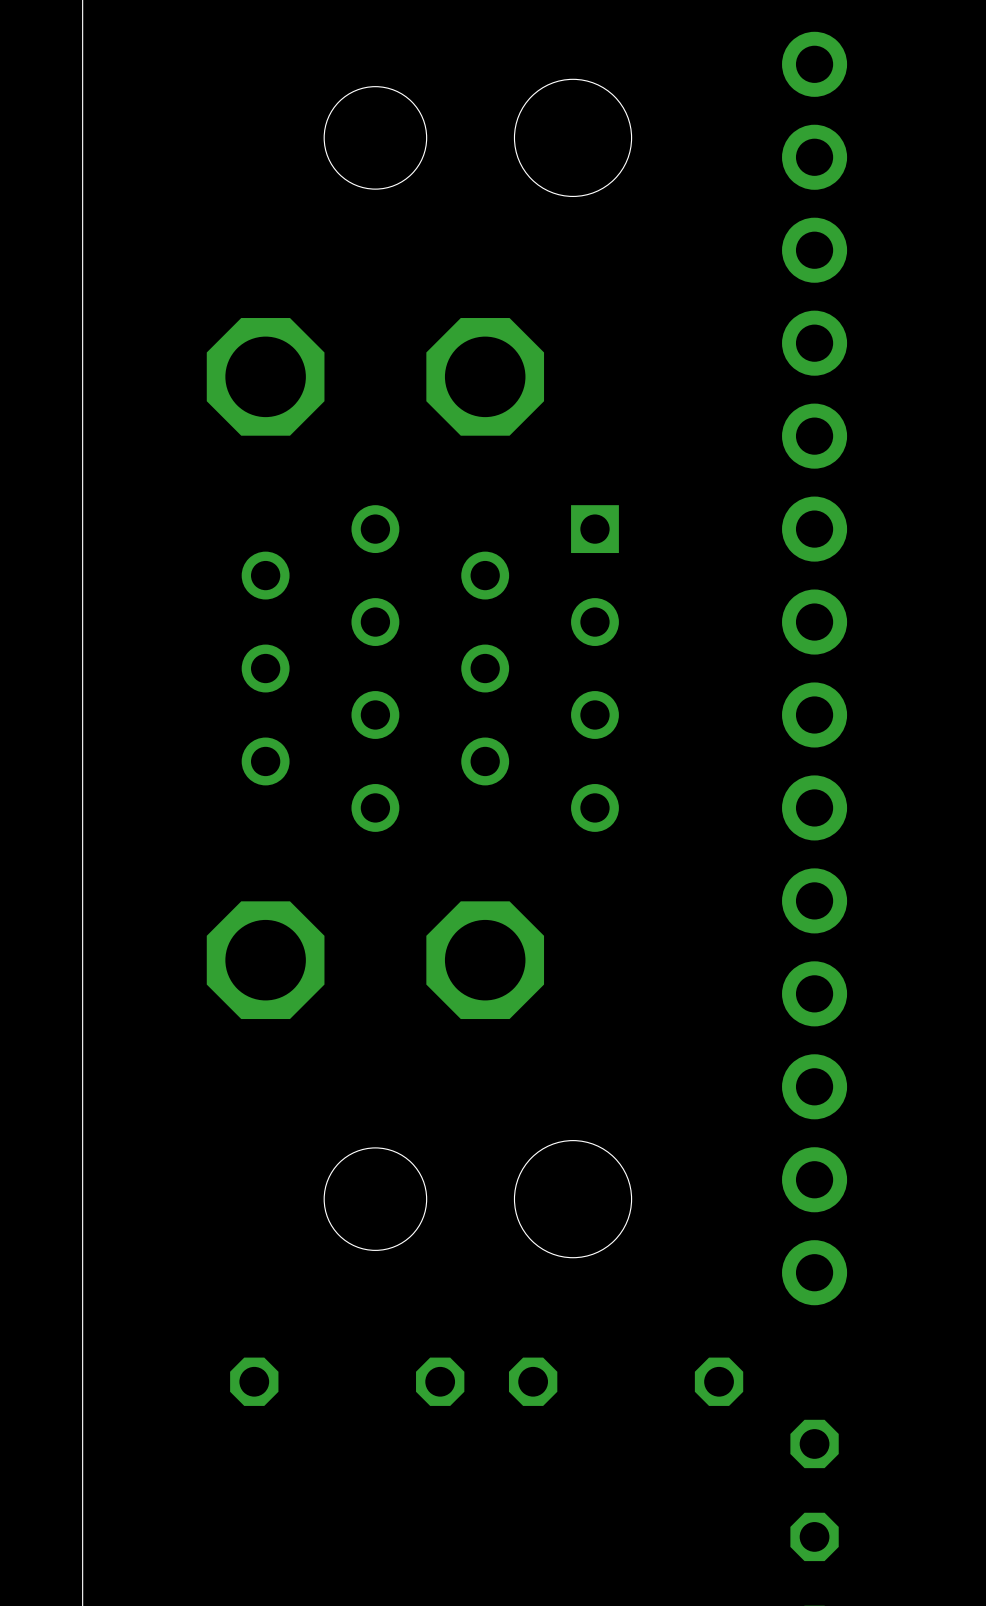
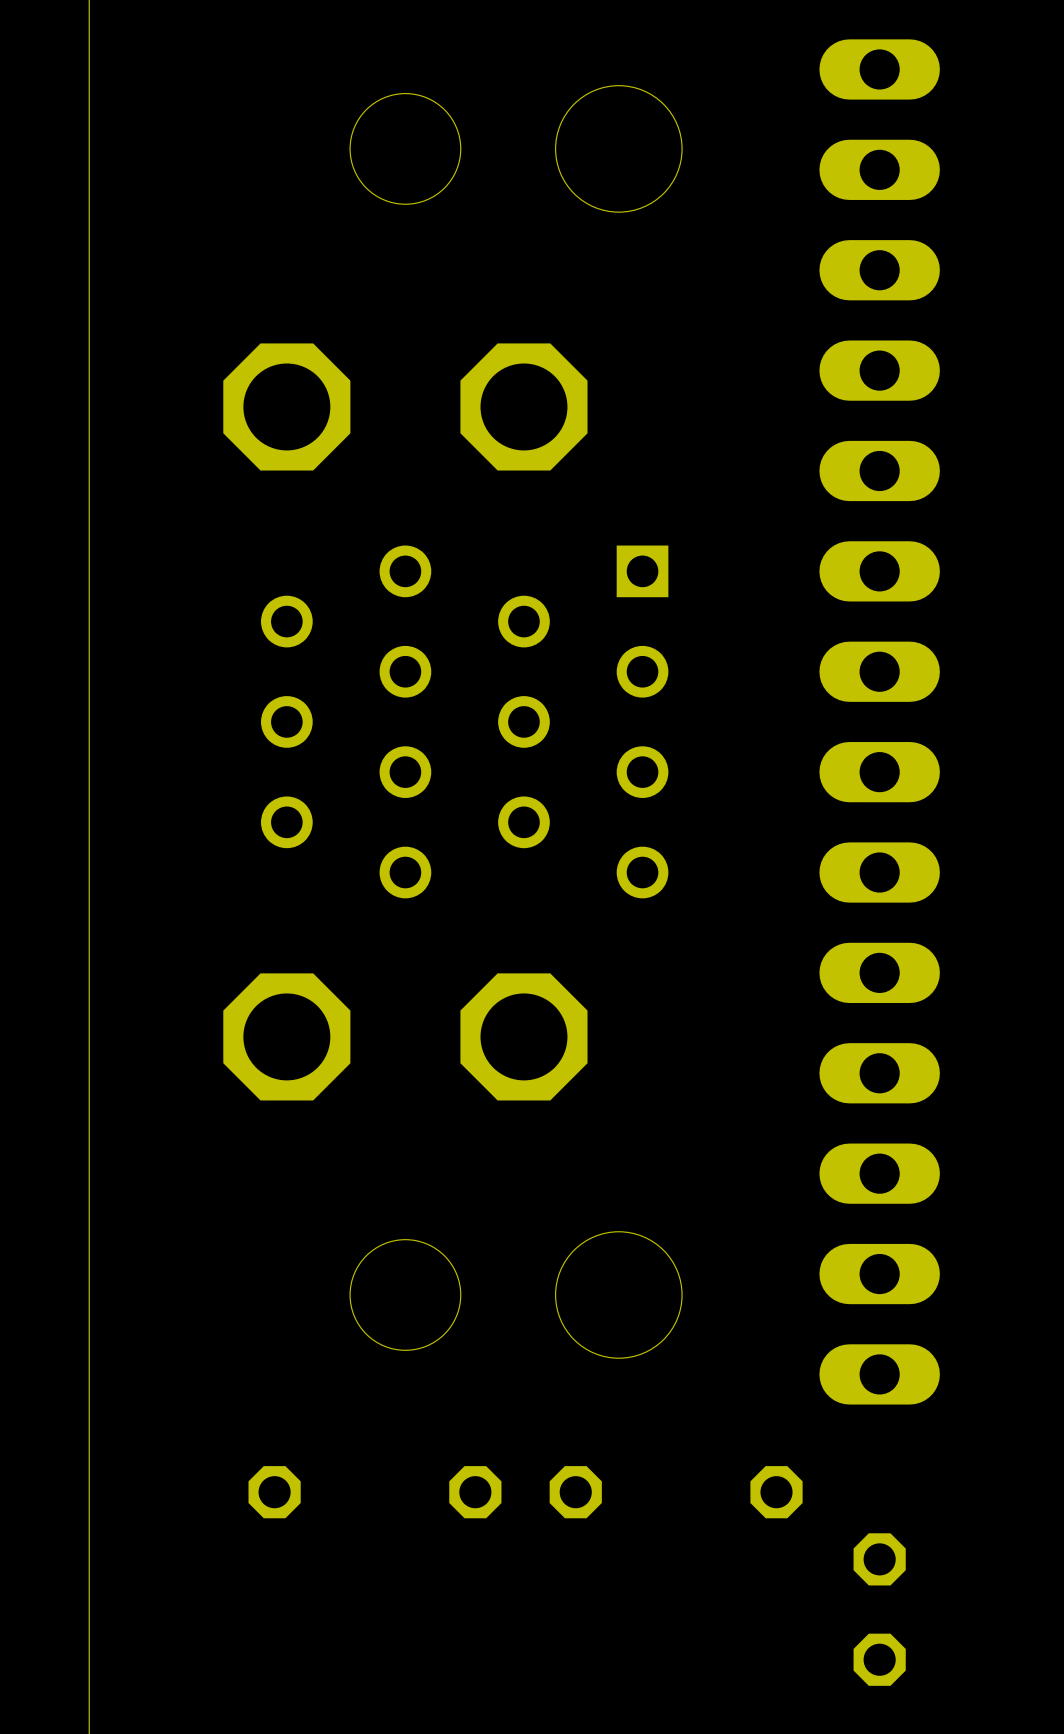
part footprint: [782, 31, 848, 1306] -> [819, 39, 940, 1405]

